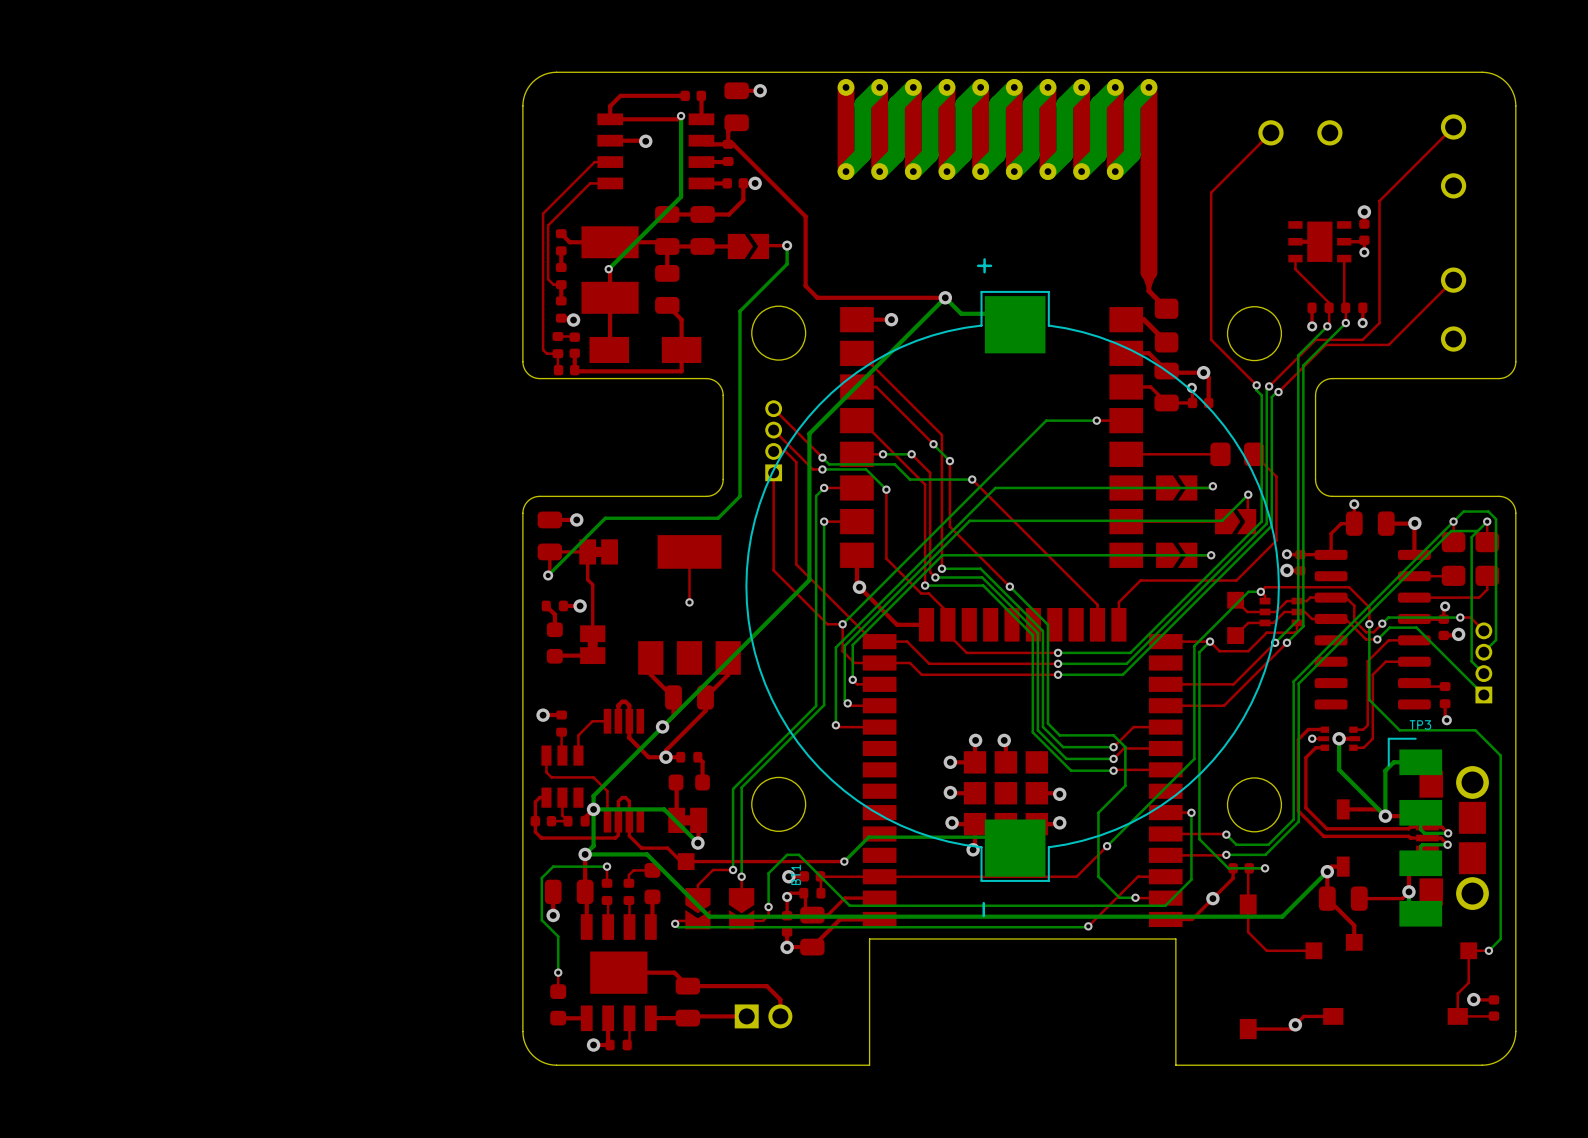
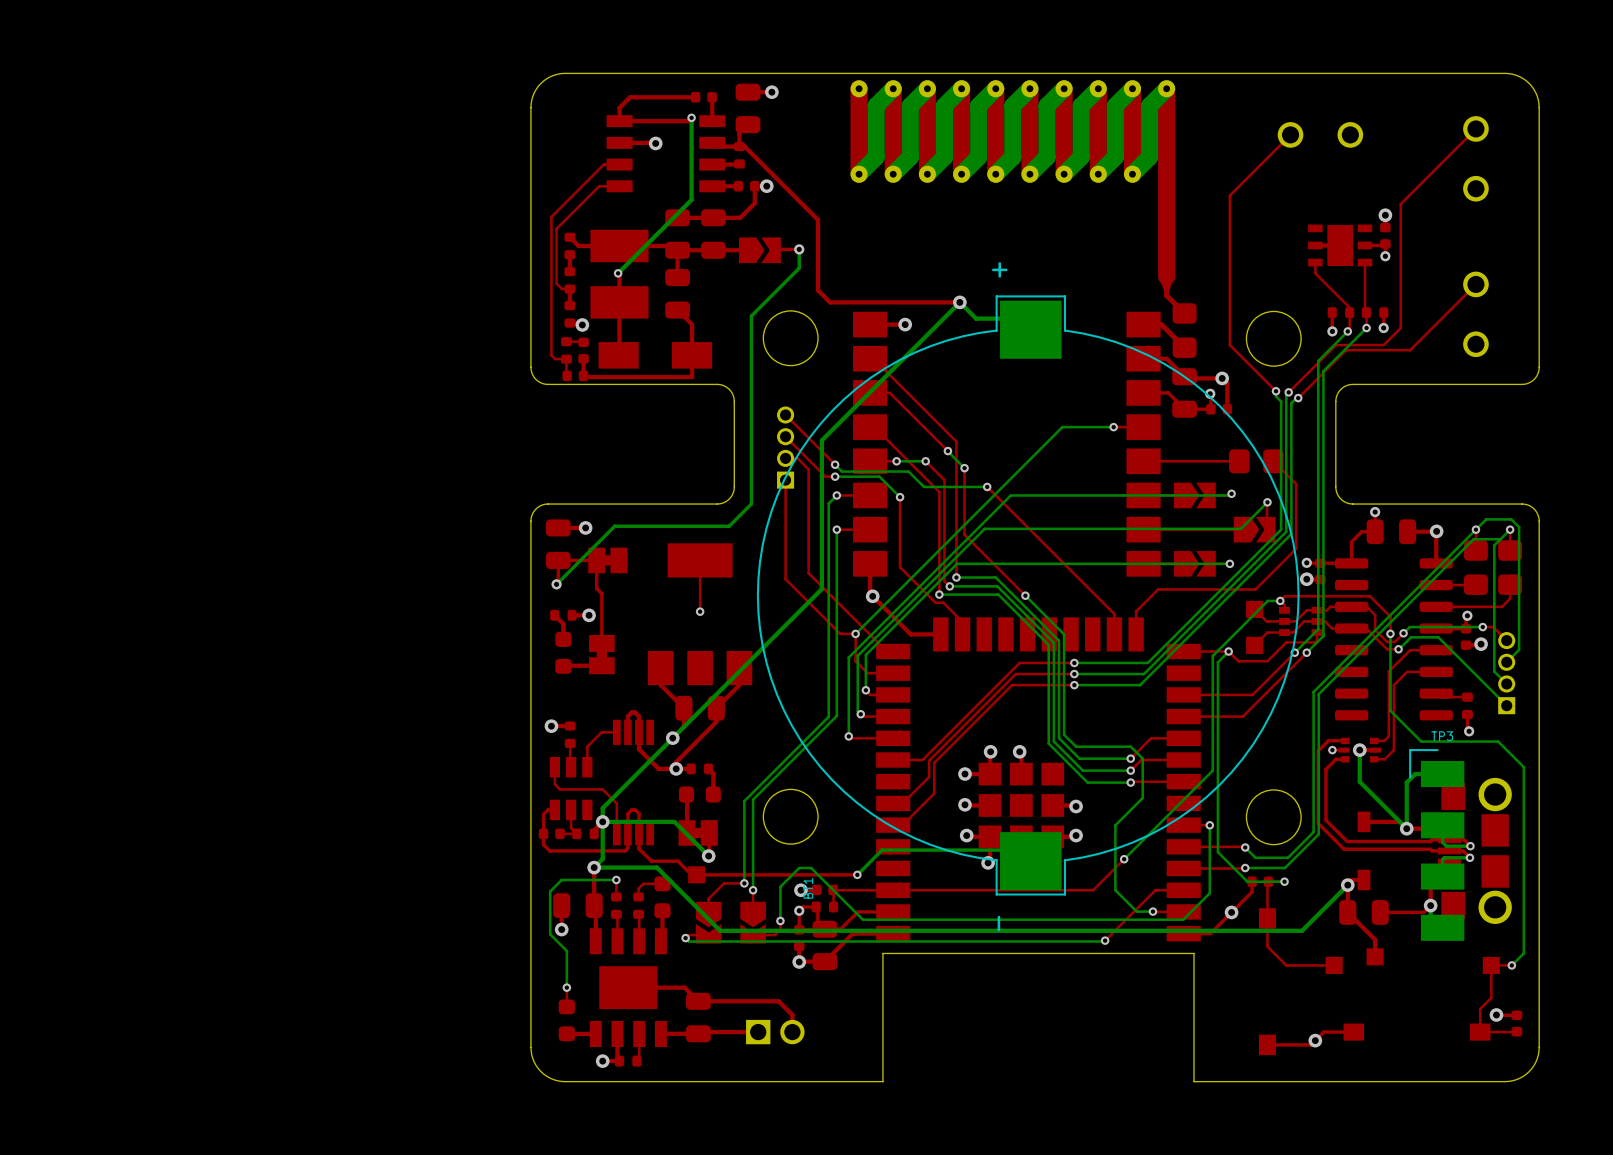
top track: (947, 624) (947, 634) (966, 652) (1004, 652) -> (893, 760) (922, 760) (1019, 662)
top track: (879, 641) (907, 641) (929, 663) (1000, 663) -> (902, 803) (929, 776) (929, 760) (1015, 674)
top track: (879, 663) (909, 663) (921, 674) (996, 674) -> (902, 825) (934, 793) (934, 762) (1011, 685)

